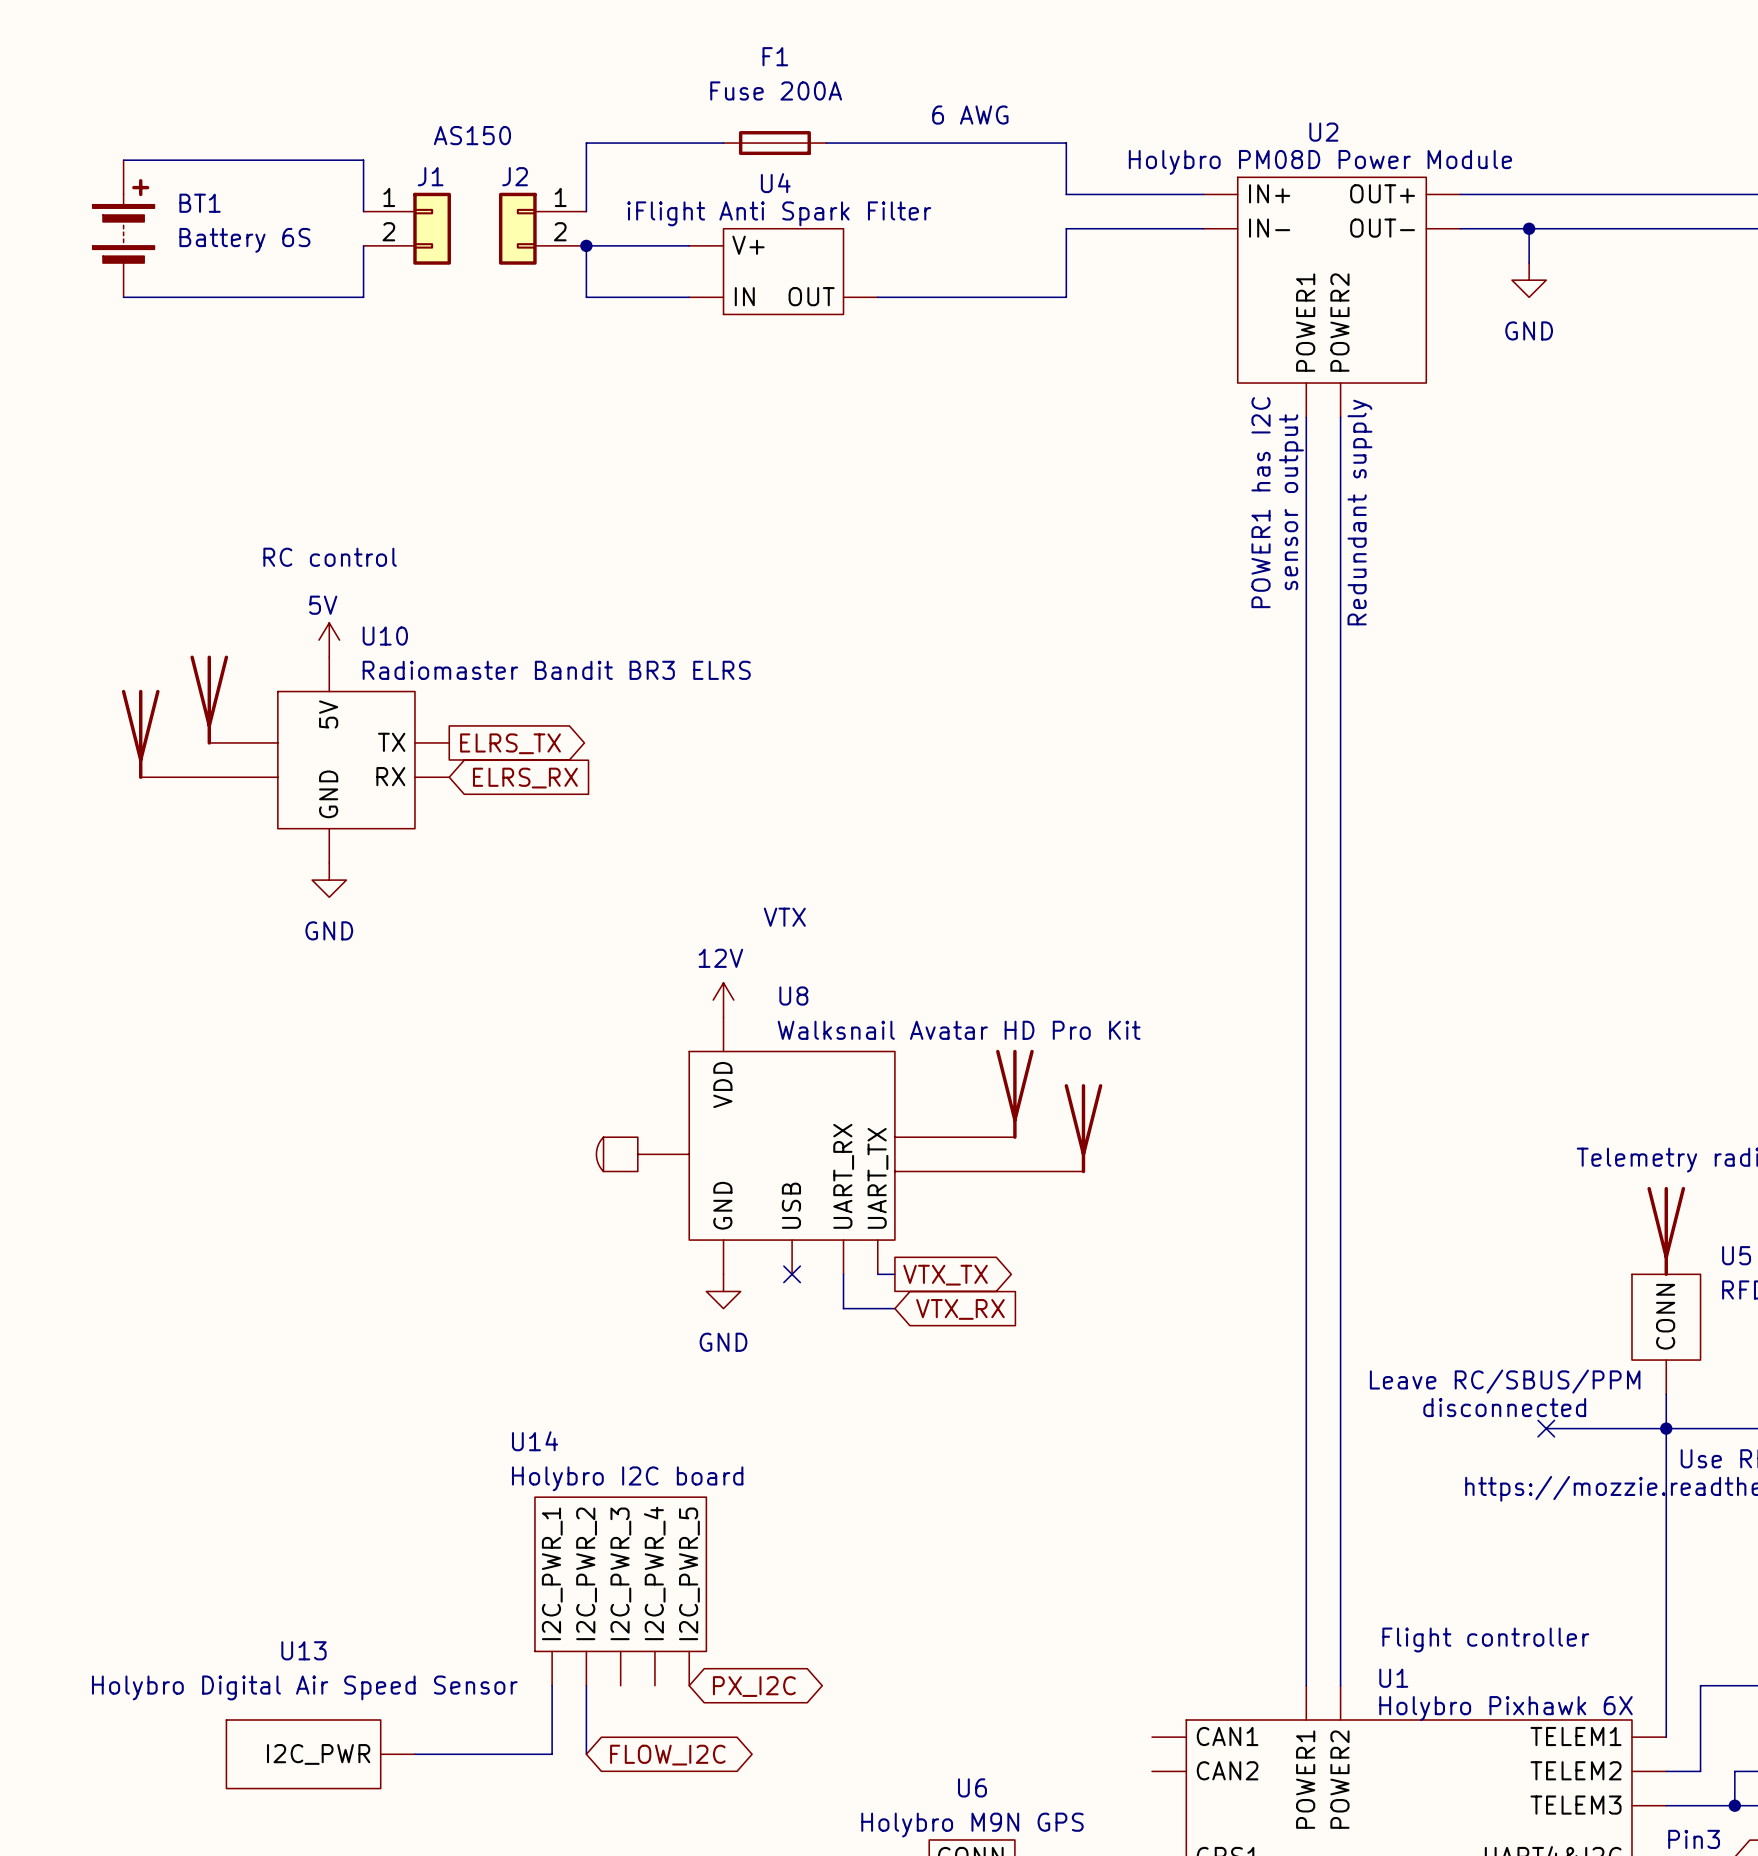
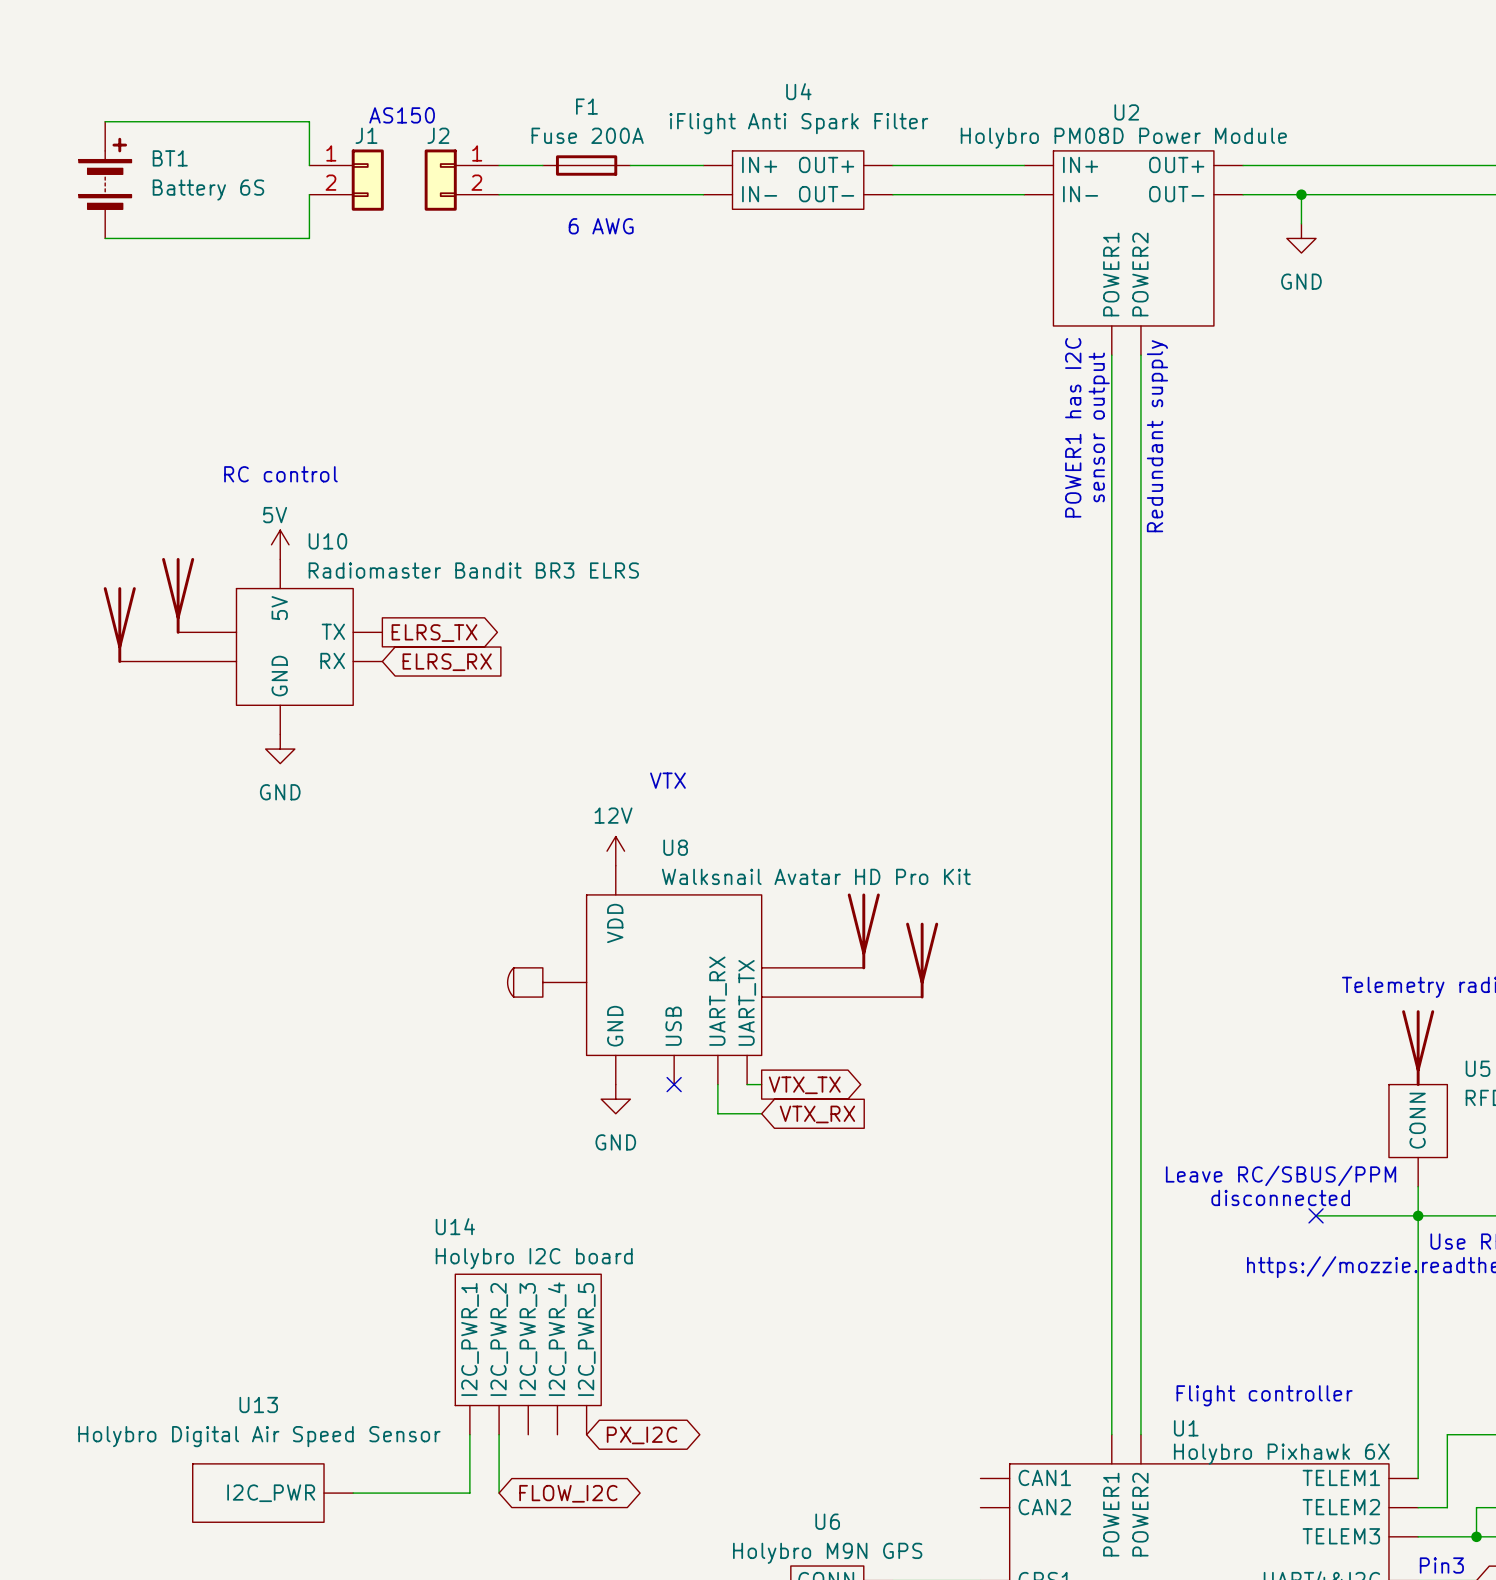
F1 name position: F1 (775, 56) -> F1 (586, 106)
F1 value position: Fuse 200A (776, 90) -> Fuse 200A (587, 135)
text position: 6 AWG (970, 115) -> 6 AWG (601, 226)
wire: (723, 143) (586, 143) (586, 211) -> none
F1 position: (774, 143) -> (586, 165)
wire: (826, 143) (1066, 143) (1066, 194) -> (892, 165) (907, 165)
wire: (123, 160) (363, 160) -> (105, 121) (309, 121) (309, 136)
wire: (363, 194) (363, 211) -> (309, 194) (309, 209)
wire: none -> (499, 165) (542, 165)
wire: none -> (630, 165) (703, 165)
BT1 position: (123, 228) -> (105, 180)
J1 position: (407, 228) -> (346, 180)
J2 position: (542, 228) -> (461, 180)
wire: none -> (499, 194) (703, 194)
U4 symbol: [689, 228, 878, 315] -> [703, 150, 893, 210]
wire: (1066, 228) (1066, 297) (877, 297) -> (907, 194) (892, 194)
junction: (586, 245) -> none
wire: (689, 245) (586, 245) (586, 297) (689, 297) -> none
wire: (363, 280) (363, 297) (123, 297) -> (309, 238) (105, 238)

